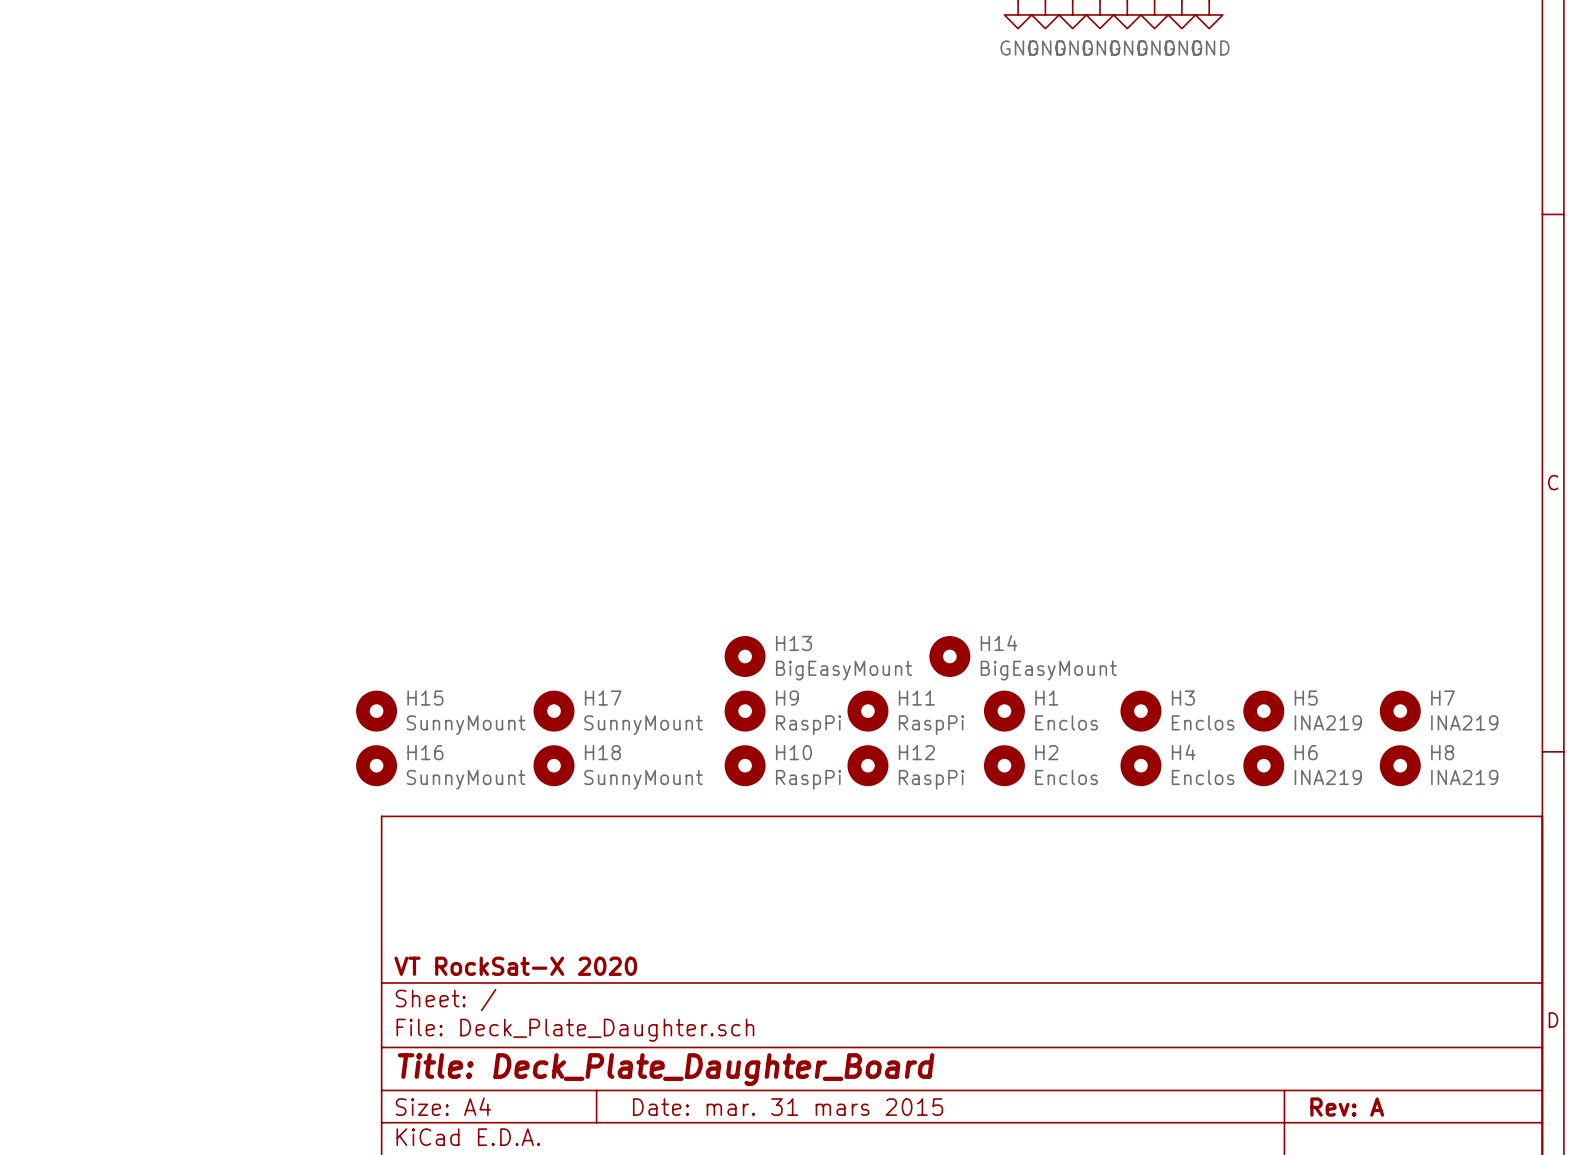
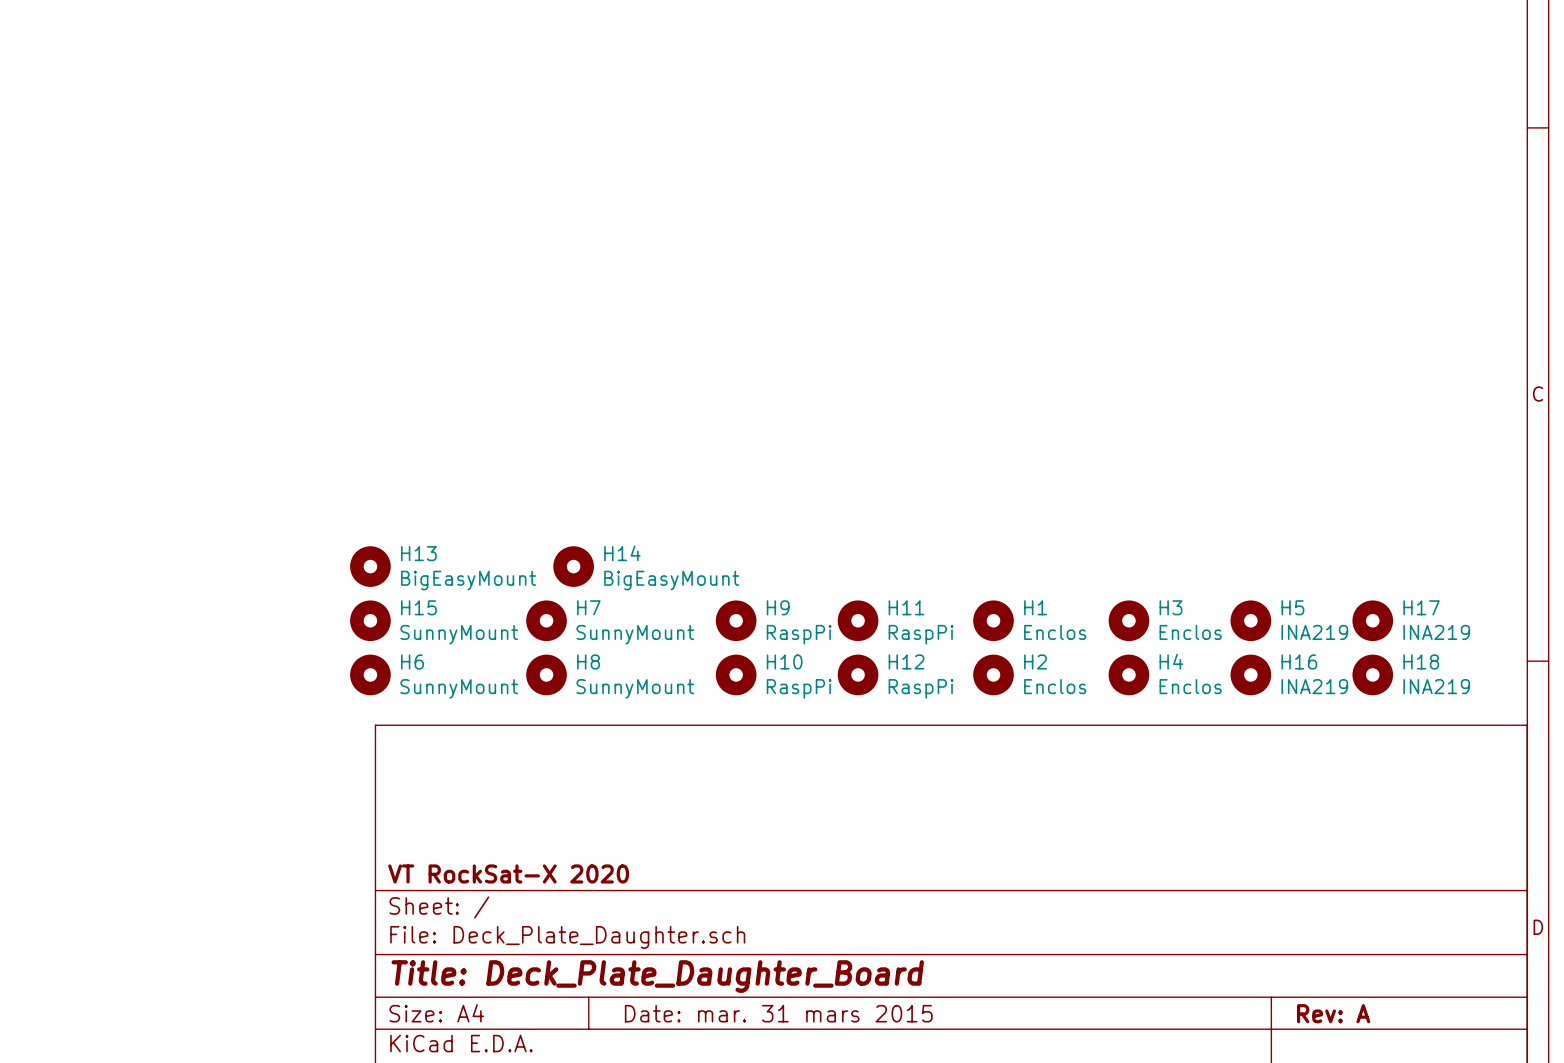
H13 position: (745, 656) -> (370, 566)
H14 position: (949, 656) -> (573, 566)
H17 name: H17 (603, 698) -> H7 (588, 607)
H17: none -> INA219 (1372, 620)
H7: INA219 (1400, 711) -> none
H16 name: H16 (425, 752) -> H6 (412, 661)
H18 name: H18 (602, 752) -> H8 (588, 661)
H6 name: H6 (1306, 752) -> H16 (1299, 661)
H18: none -> INA219 (1372, 674)
H8: INA219 (1400, 765) -> none

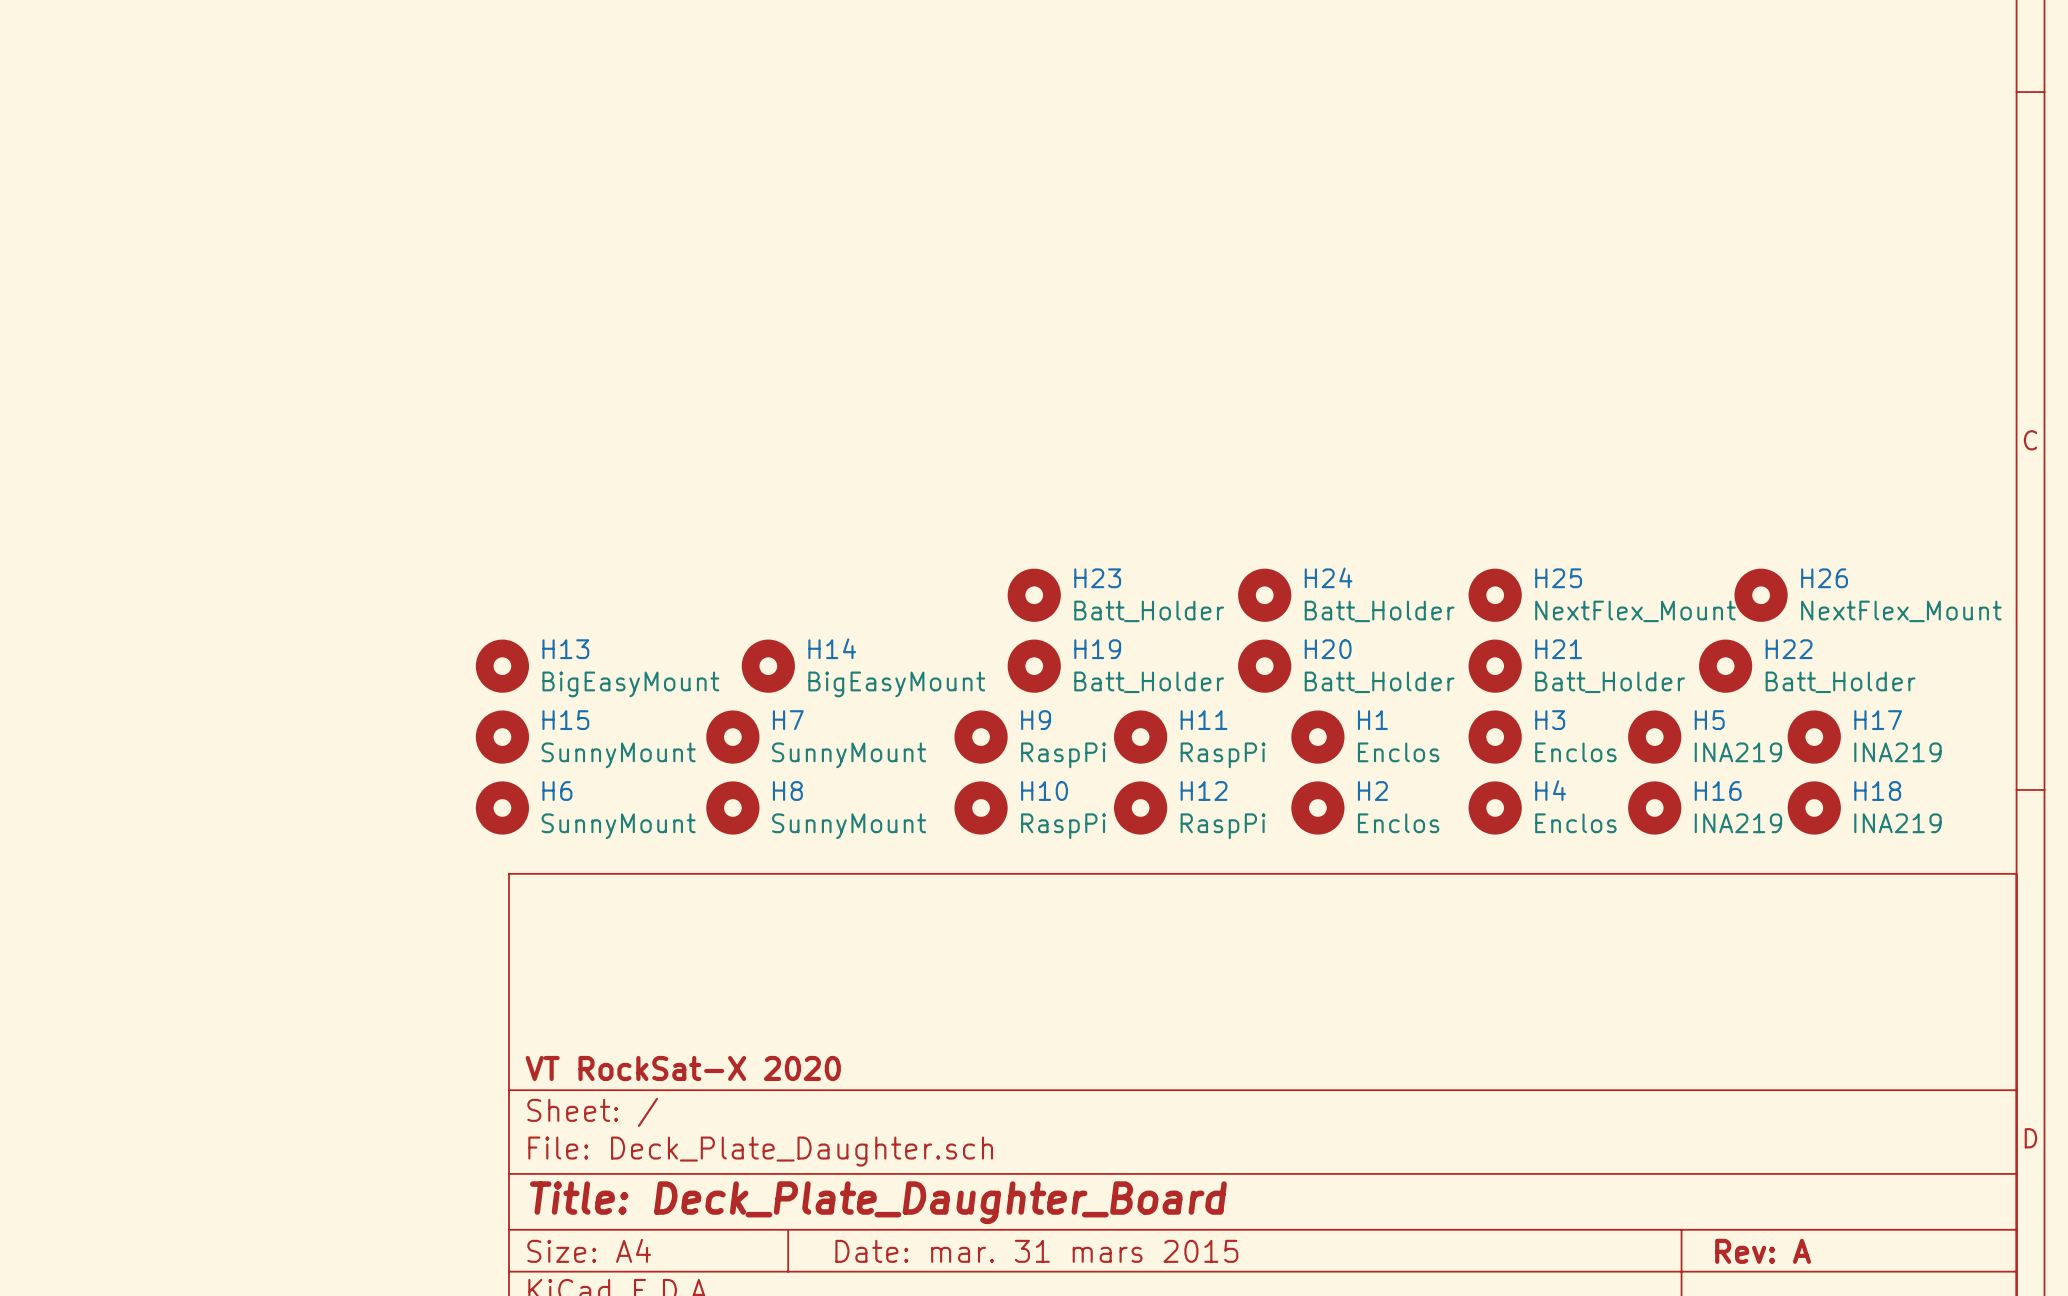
H23: none -> Batt_Holder (1034, 595)
H24: none -> Batt_Holder (1264, 595)
H25: none -> NextFlex_Mount (1495, 595)
H26: none -> NextFlex_Mount (1761, 595)
H19: none -> Batt_Holder (1034, 666)
H20: none -> Batt_Holder (1264, 666)
H21: none -> Batt_Holder (1495, 666)
H22: none -> Batt_Holder (1725, 666)

